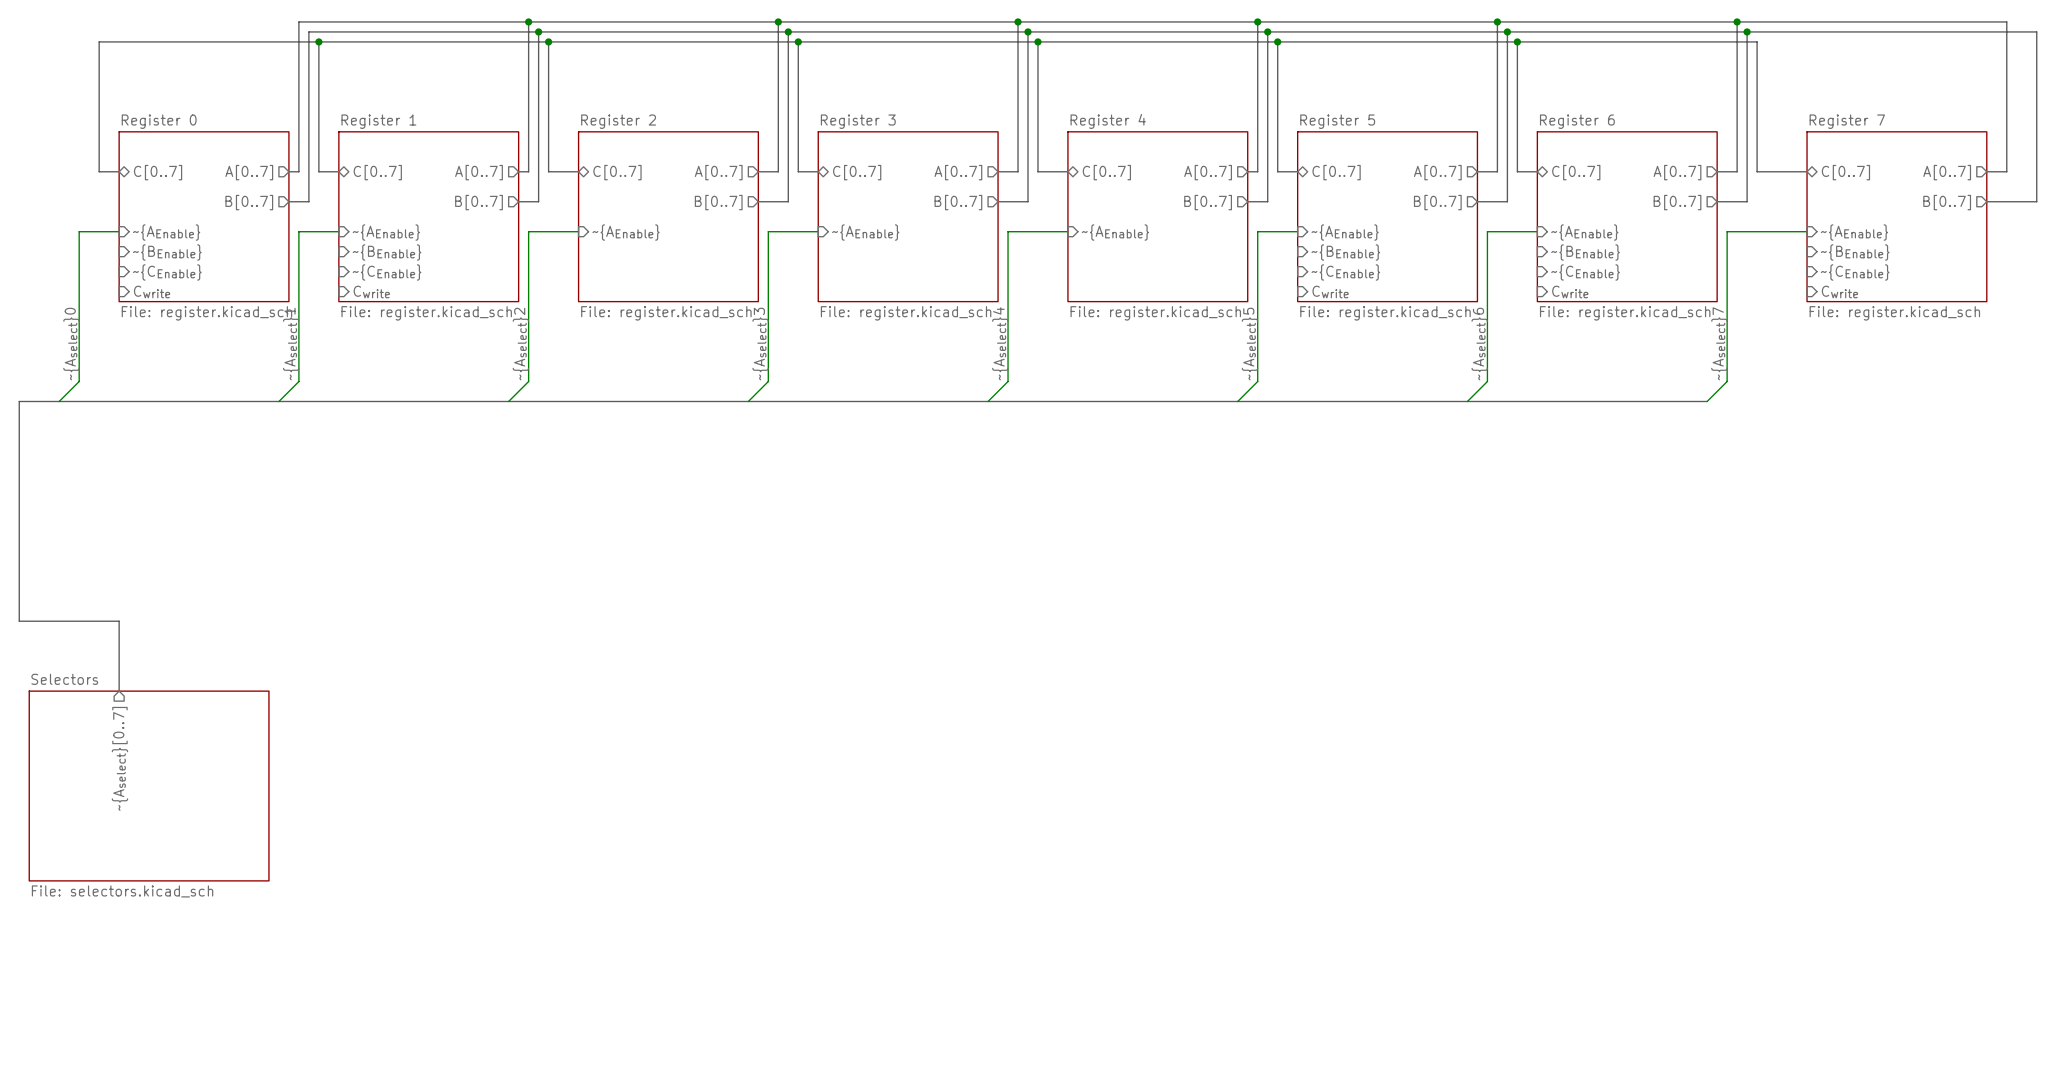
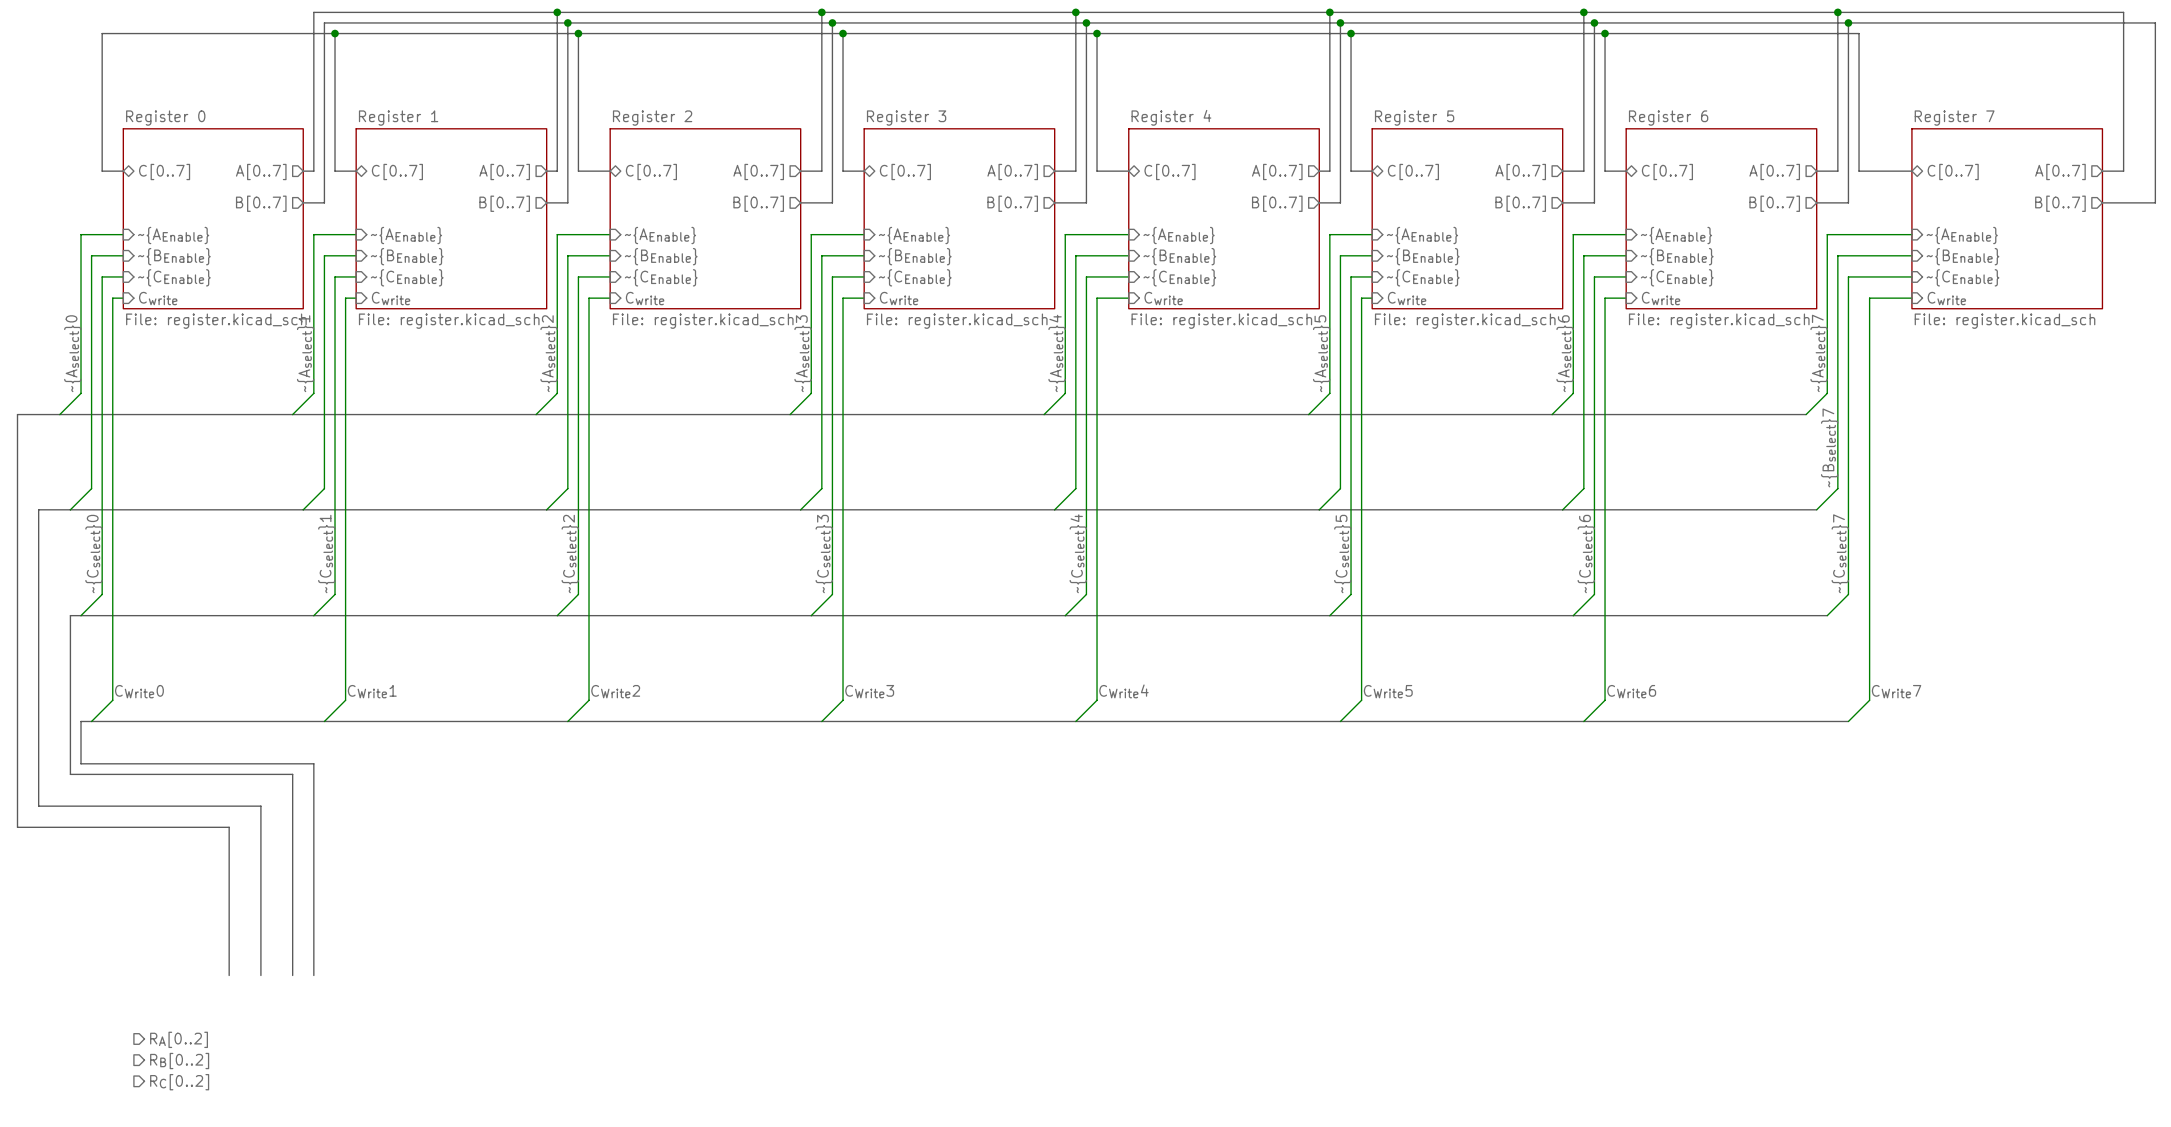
wire: none -> (123, 255) (91, 255) (91, 488) (70, 509)
wire: none -> (356, 255) (324, 255) (324, 488) (303, 509)
wire: none -> (610, 255) (567, 255) (567, 488) (546, 509)
wire: none -> (864, 255) (821, 255) (821, 488) (800, 509)
wire: none -> (1128, 255) (1075, 255) (1075, 488) (1054, 509)
wire: none -> (1372, 255) (1340, 255) (1340, 488) (1319, 509)
wire: none -> (1626, 255) (1583, 255) (1583, 488) (1562, 509)
wire: none -> (1911, 255) (1837, 255) (1837, 488) (1816, 509)
sheet pin: none -> ~{BEnable} (661, 256)
sheet pin: none -> ~{BEnable} (915, 256)
sheet pin: none -> ~{BEnable} (1179, 256)
wire: none -> (123, 276) (102, 276) (102, 594) (81, 615)
wire: none -> (356, 276) (335, 276) (335, 594) (313, 615)
wire: none -> (610, 276) (578, 276) (578, 594) (557, 615)
wire: none -> (864, 276) (832, 276) (832, 594) (811, 615)
wire: none -> (1128, 276) (1086, 276) (1086, 594) (1065, 615)
wire: none -> (1372, 276) (1351, 276) (1351, 594) (1329, 615)
wire: none -> (1626, 276) (1594, 276) (1594, 594) (1573, 615)
wire: none -> (1911, 276) (1848, 276) (1848, 594) (1827, 615)
sheet pin: none -> ~{CEnable} (661, 277)
sheet pin: none -> ~{CEnable} (915, 277)
sheet pin: none -> ~{CEnable} (1179, 277)
wire: none -> (123, 298) (112, 298) (112, 700) (91, 721)
wire: none -> (356, 298) (345, 298) (345, 700) (324, 721)
wire: none -> (610, 298) (589, 298) (589, 700) (567, 721)
wire: none -> (864, 298) (843, 298) (843, 700) (821, 721)
wire: none -> (1128, 298) (1097, 298) (1097, 700) (1075, 721)
wire: none -> (1372, 298) (1361, 298) (1361, 700) (1340, 721)
wire: none -> (1626, 298) (1605, 298) (1605, 700) (1583, 721)
wire: none -> (1911, 298) (1869, 298) (1869, 700) (1848, 721)
sheet pin: none -> Cwrite (645, 298)
sheet pin: none -> Cwrite (899, 298)
sheet pin: none -> Cwrite (1163, 298)
label: none -> ~{Bselect}7 (1829, 447)
bus: none -> (1816, 509) (38, 509) (38, 806) (260, 806) (260, 975)
label: none -> ~{Cselect}4 (1078, 553)
label: none -> ~{Cselect}7 (1840, 553)
label: none -> ~{Cselect}0 (93, 554)
label: none -> ~{Cselect}1 (326, 554)
label: none -> ~{Cselect}2 (570, 554)
label: none -> ~{Cselect}3 (824, 554)
label: none -> ~{Cselect}5 (1342, 554)
label: none -> ~{Cselect}6 (1586, 554)
bus: none -> (1827, 615) (70, 615) (70, 774) (292, 774) (292, 975)
bus: (19, 621) (119, 621) (119, 691) -> (17, 647) (17, 827) (229, 827) (229, 975)
label: none -> CWrite0 (139, 691)
label: none -> CWrite1 (372, 691)
label: none -> CWrite2 (615, 691)
label: none -> CWrite3 (869, 691)
label: none -> CWrite4 (1123, 691)
label: none -> CWrite5 (1388, 691)
label: none -> CWrite6 (1631, 691)
label: none -> CWrite7 (1896, 691)
bus: none -> (1848, 721) (81, 721) (81, 763) (313, 763) (313, 975)
sheet pin: ~{Aselect}[0..7] (119, 758) -> none
sheet Selectors: File: selectors.kicad_sch (149, 786) -> none
sheet pin: none -> RA[0..2] (179, 1039)
sheet pin: none -> RB[0..2] (179, 1061)
sheet pin: none -> RC[0..2] (179, 1082)

